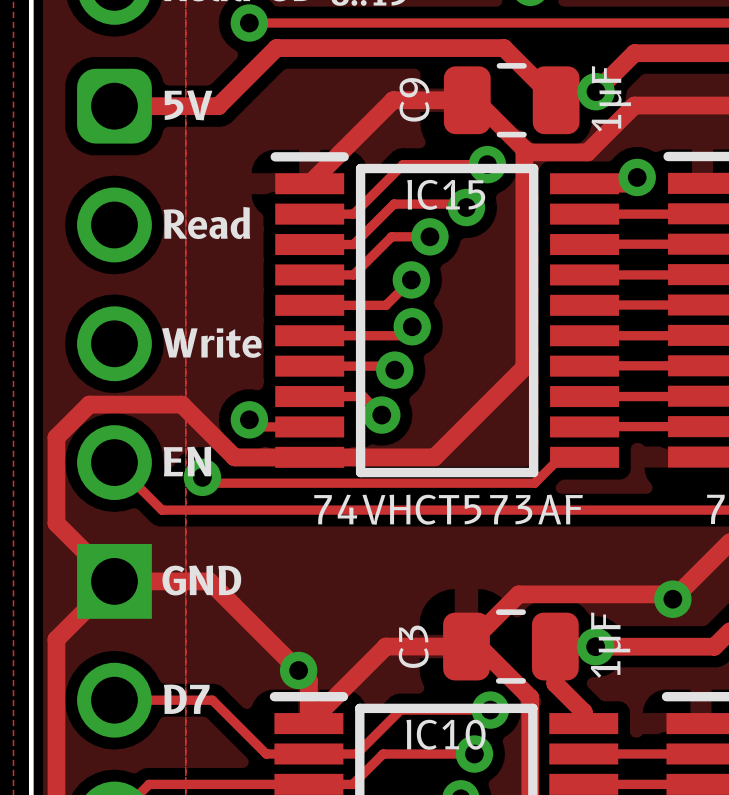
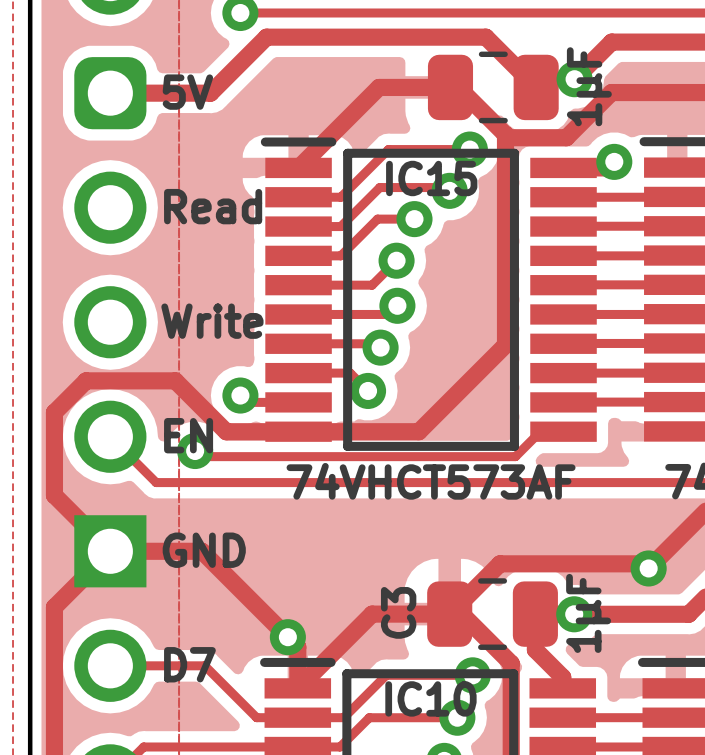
C9 name: C9 (414, 99) -> none

